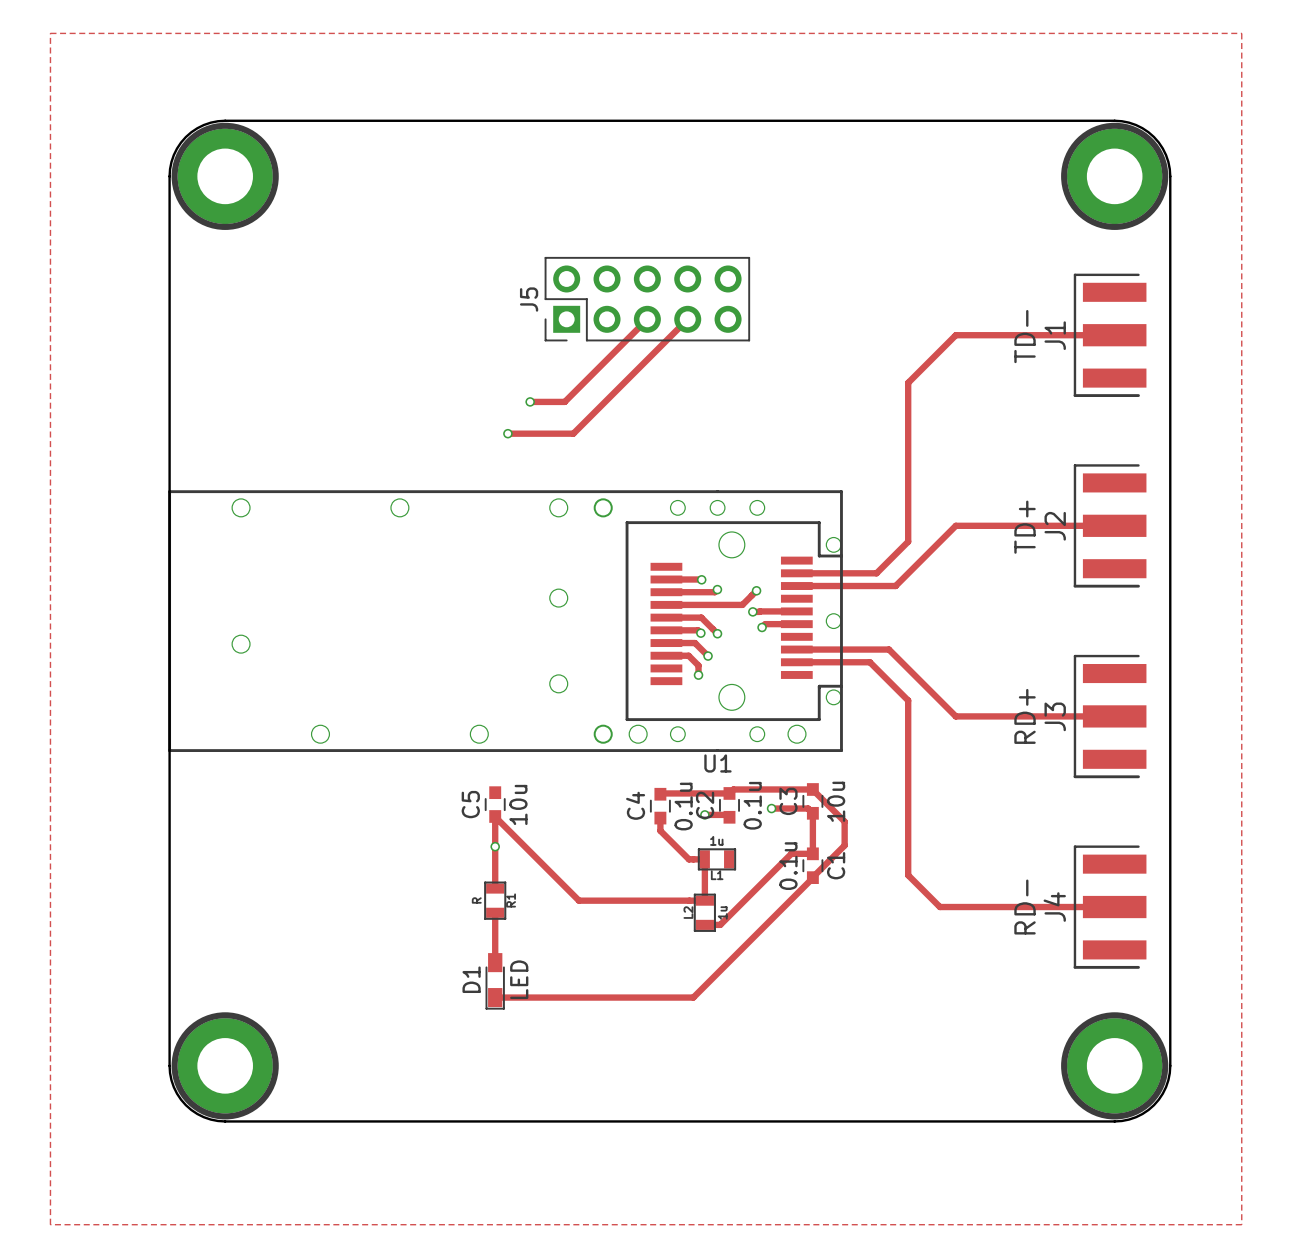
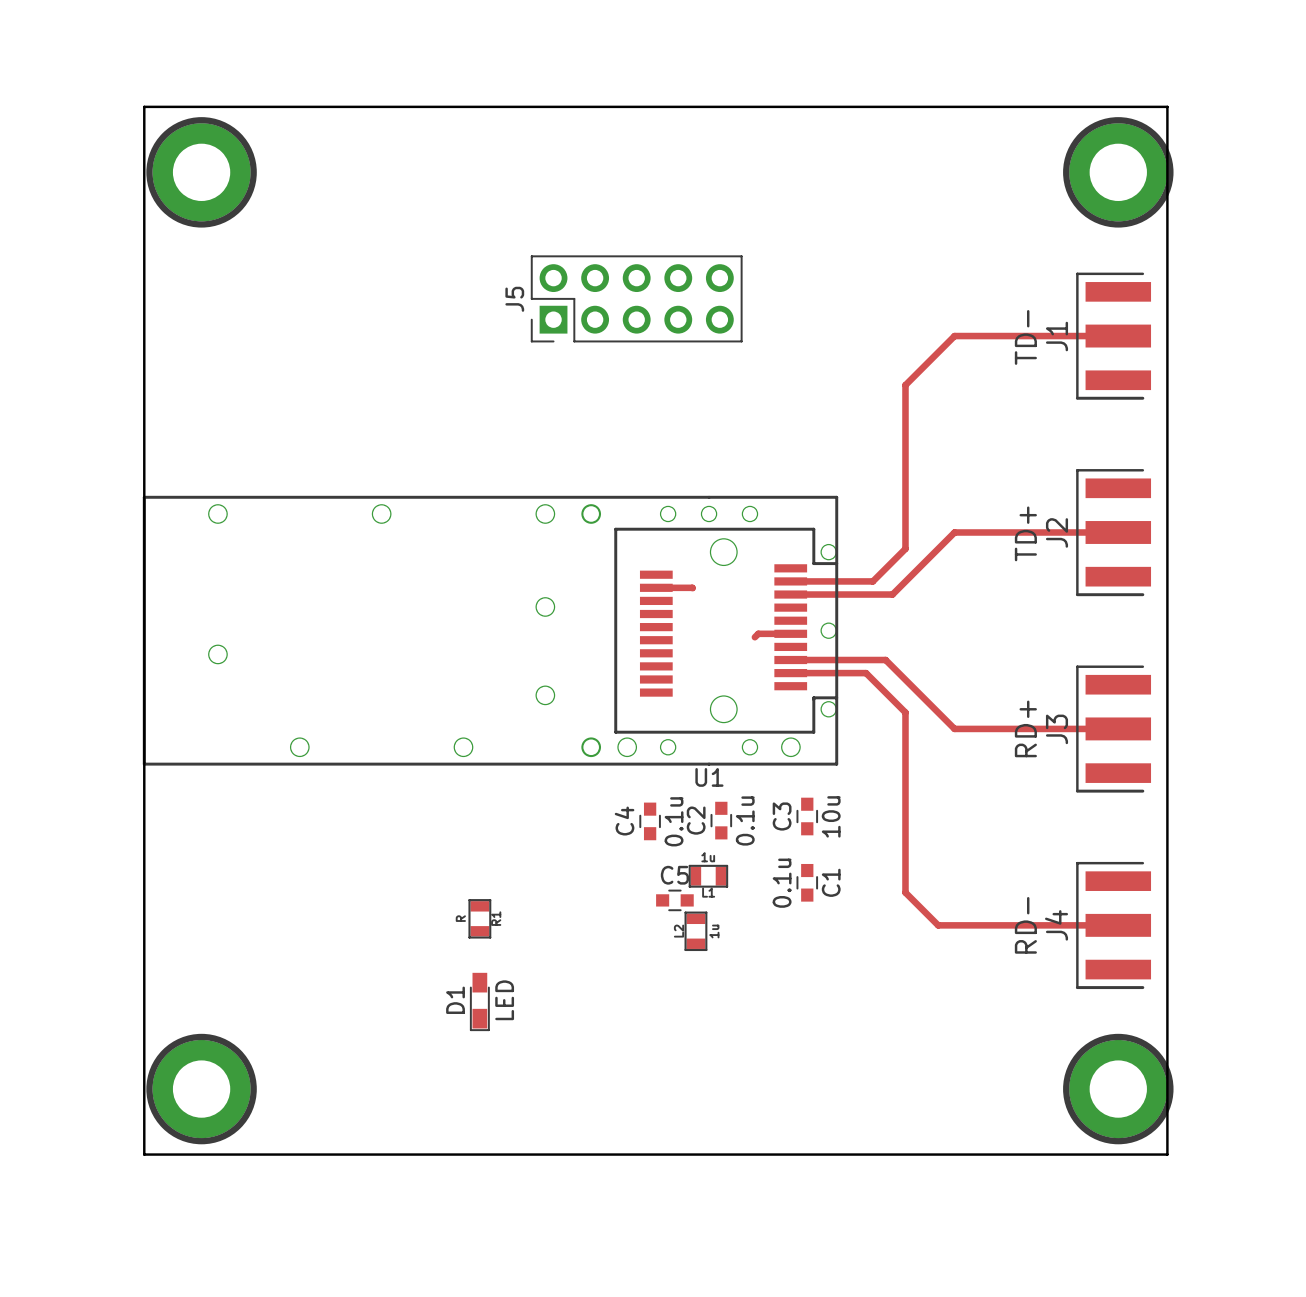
zone outline: (50, 33) (50, 1224) (1241, 1224) (1241, 33) (50, 33) -> none
board edge: (169, 176) (173, 155) (185, 137) (203, 125) (225, 120) (1114, 120) (1135, 125) (1153, 137) (1166, 155) (1170, 176) (1170, 1065) (1166, 1087) (1153, 1105) (1135, 1117) (1114, 1121) (225, 1121) (203, 1117) (185, 1105) (173, 1087) (169, 1065) -> (144, 172) (144, 106) (1167, 106) (1167, 1154) (144, 1154) (144, 1089)
track: (647, 319) (564, 401) (530, 401) -> none
track: (687, 319) (573, 433) (507, 433) -> none
via: (530, 401) -> none
via: (507, 433) -> none
via: (701, 579) -> none
track: (717, 589) (714, 592) (666, 592) -> none
via: (717, 589) -> none
track: (756, 590) (742, 604) (666, 604) -> none
via: (756, 590) -> none
via: (752, 611) -> none
track: (796, 611) (752, 611) -> none
track: (666, 617) (701, 617) (717, 633) -> none
via: (762, 627) -> none
track: (666, 630) (698, 630) (700, 633) -> none
via: (700, 633) -> none
via: (717, 633) -> none
track: (666, 643) (695, 643) (708, 656) -> none
track: (666, 655) (688, 655) (698, 665) (698, 675) -> none
via: (708, 656) -> none
via: (698, 675) -> none
track: (660, 794) (729, 793) (733, 789) (812, 789) (844, 821) (844, 845) (693, 997) (495, 997) -> none
C5 rotation: 0° (495, 804) -> 90° clockwise (674, 900)
C5 position: (495, 804) -> (674, 900)
C5 value: 10u (518, 804) -> none
track: (771, 808) (808, 808) (812, 813) (812, 853) (791, 853) (720, 924) (704, 924) -> none
via: (771, 808) -> none
track: (704, 814) (727, 814) (729, 817) -> none
via: (704, 814) -> none
track: (495, 816) (495, 888) -> none
track: (495, 816) (578, 900) (704, 900) (704, 859) (688, 859) (660, 830) (660, 818) -> none
via: (495, 846) -> none
track: (495, 912) (495, 962) -> none

